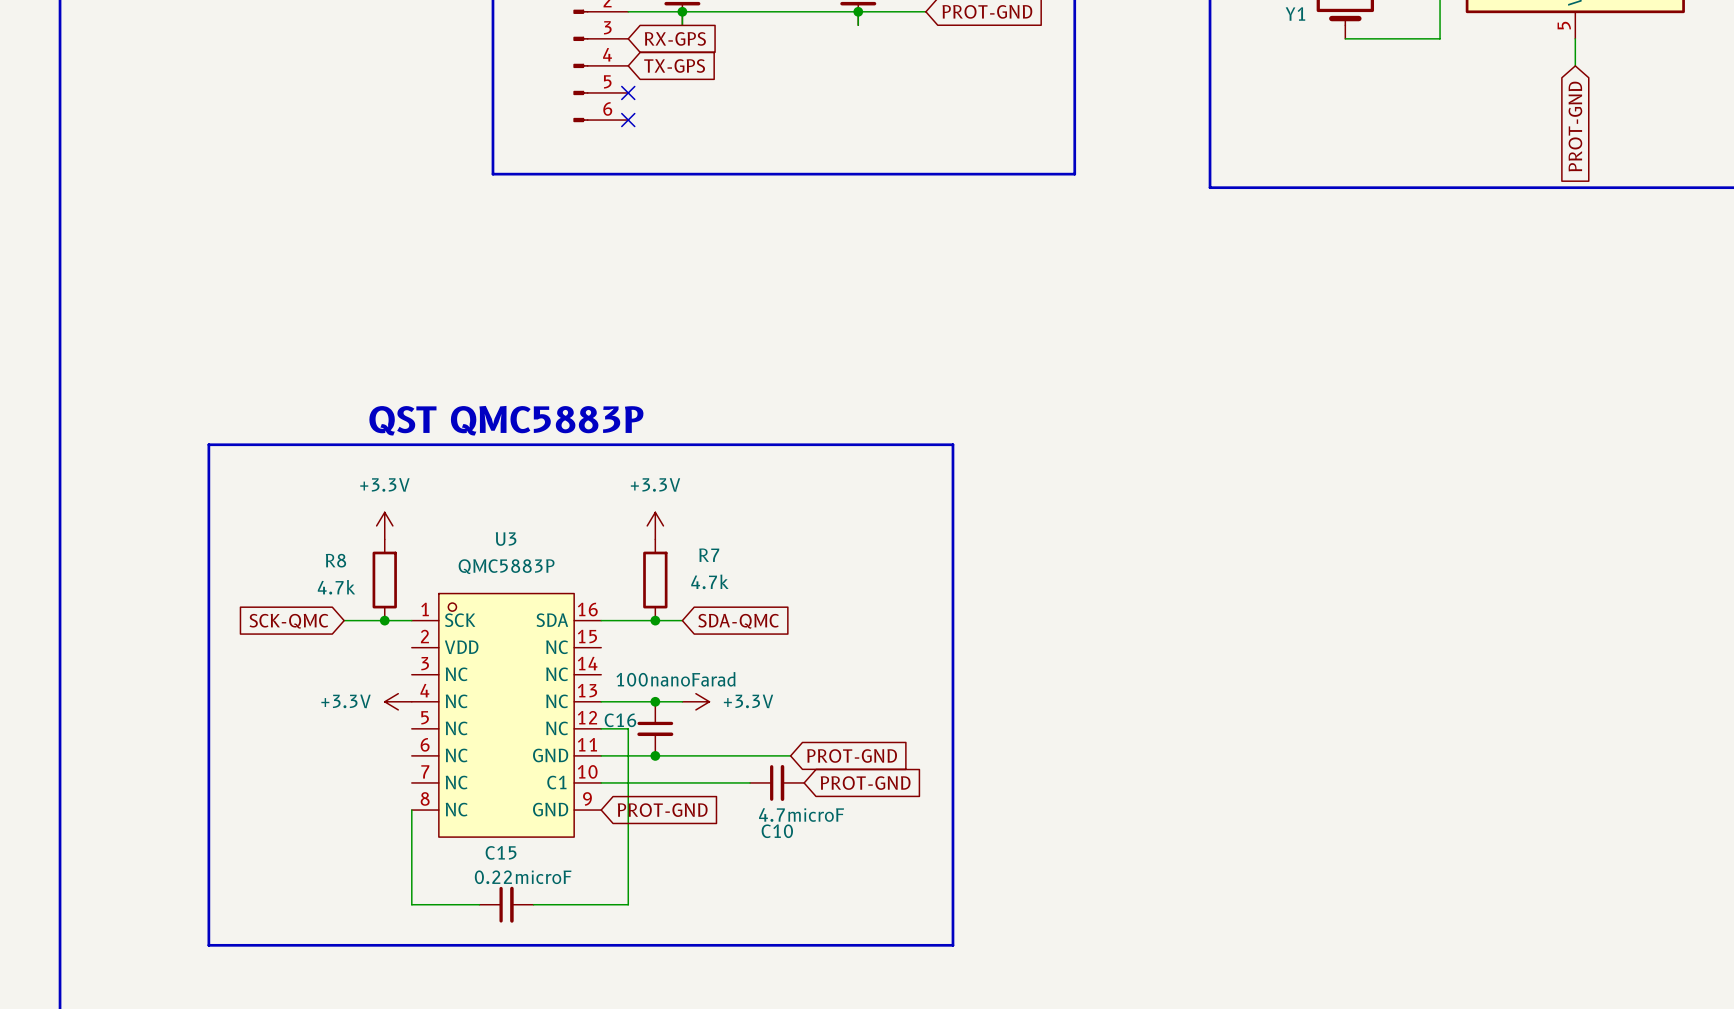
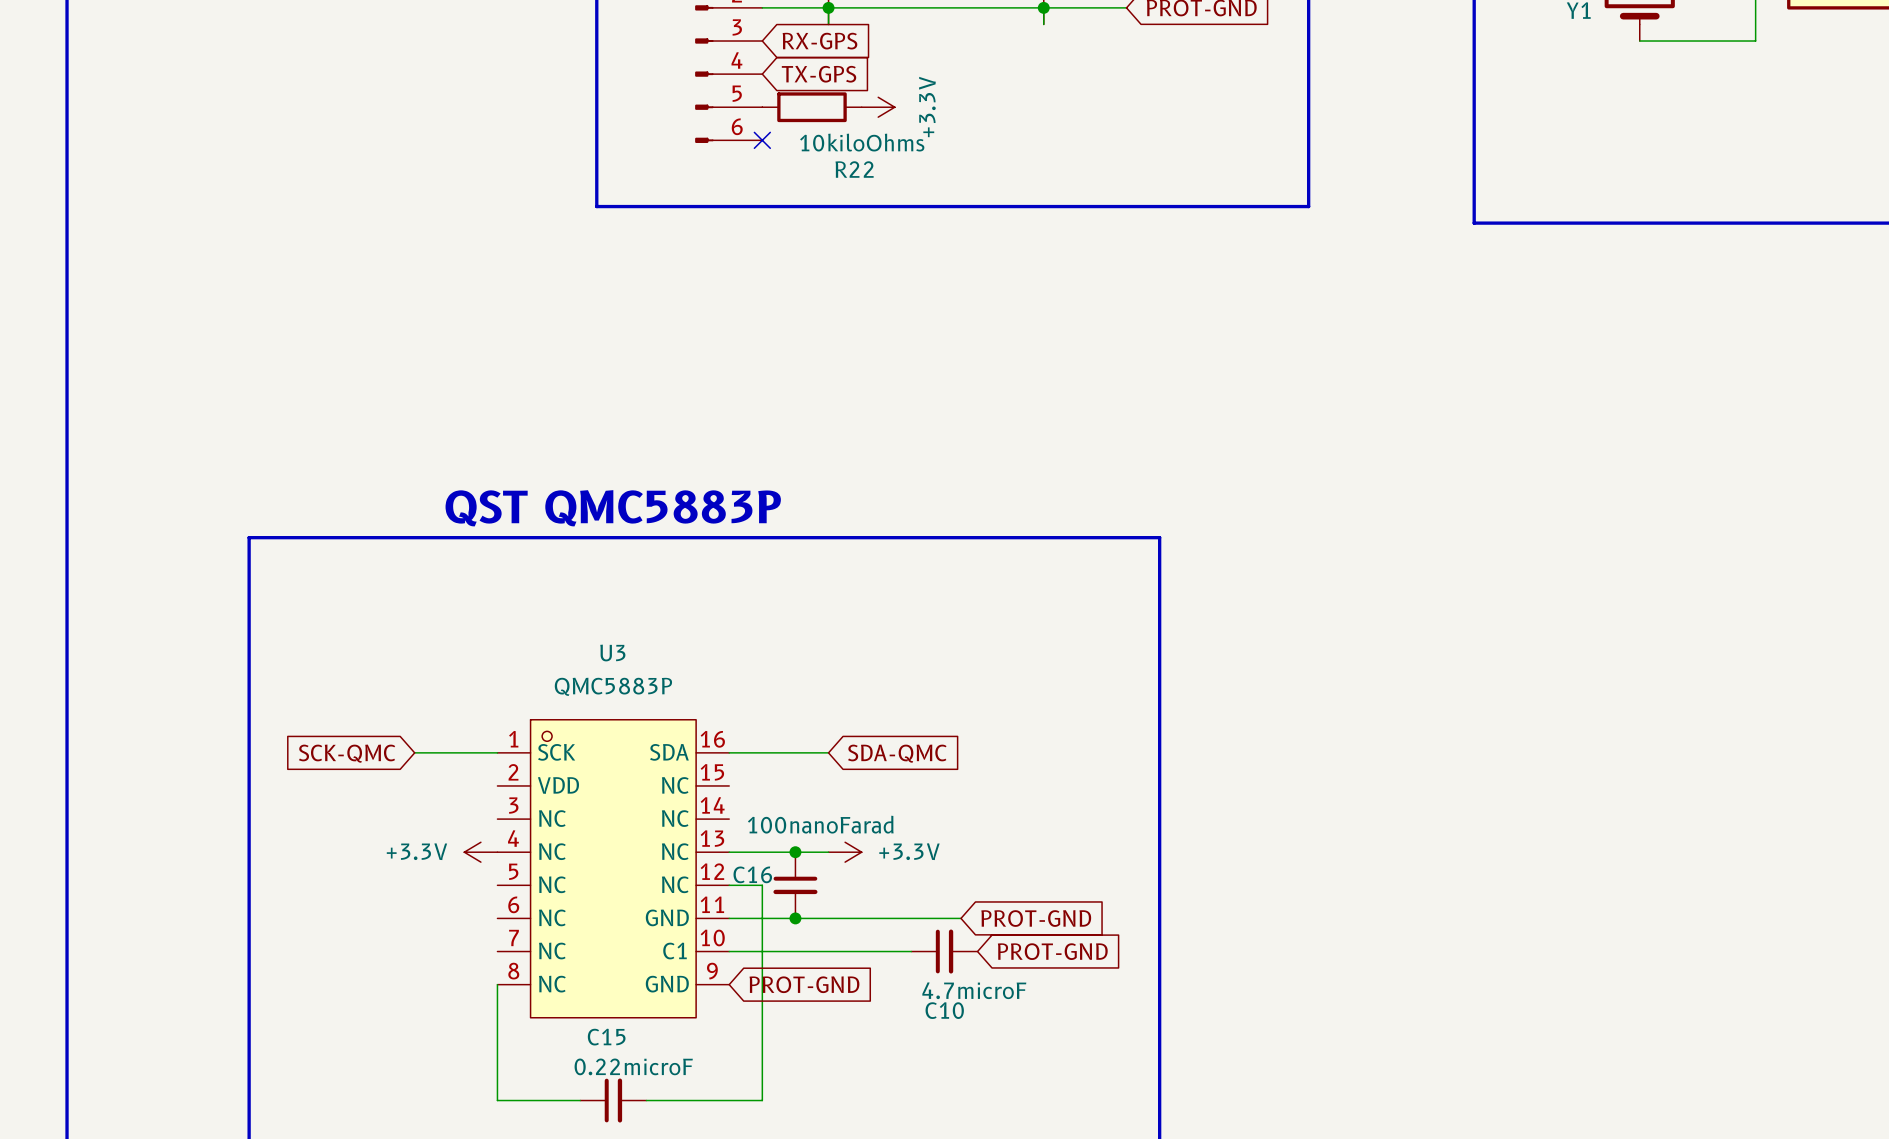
no-connect mark: (628, 92) -> none
R22: none -> 10kiloOhms (812, 107)
power symbol: none -> +3.3V (878, 107)
power symbol: +3.3V (384, 525) -> none
power symbol: +3.3V (655, 525) -> none
R8: 4.7k (384, 580) -> none
R7: 4.7k (655, 580) -> none
junction: (384, 620) -> none
junction: (655, 620) -> none

